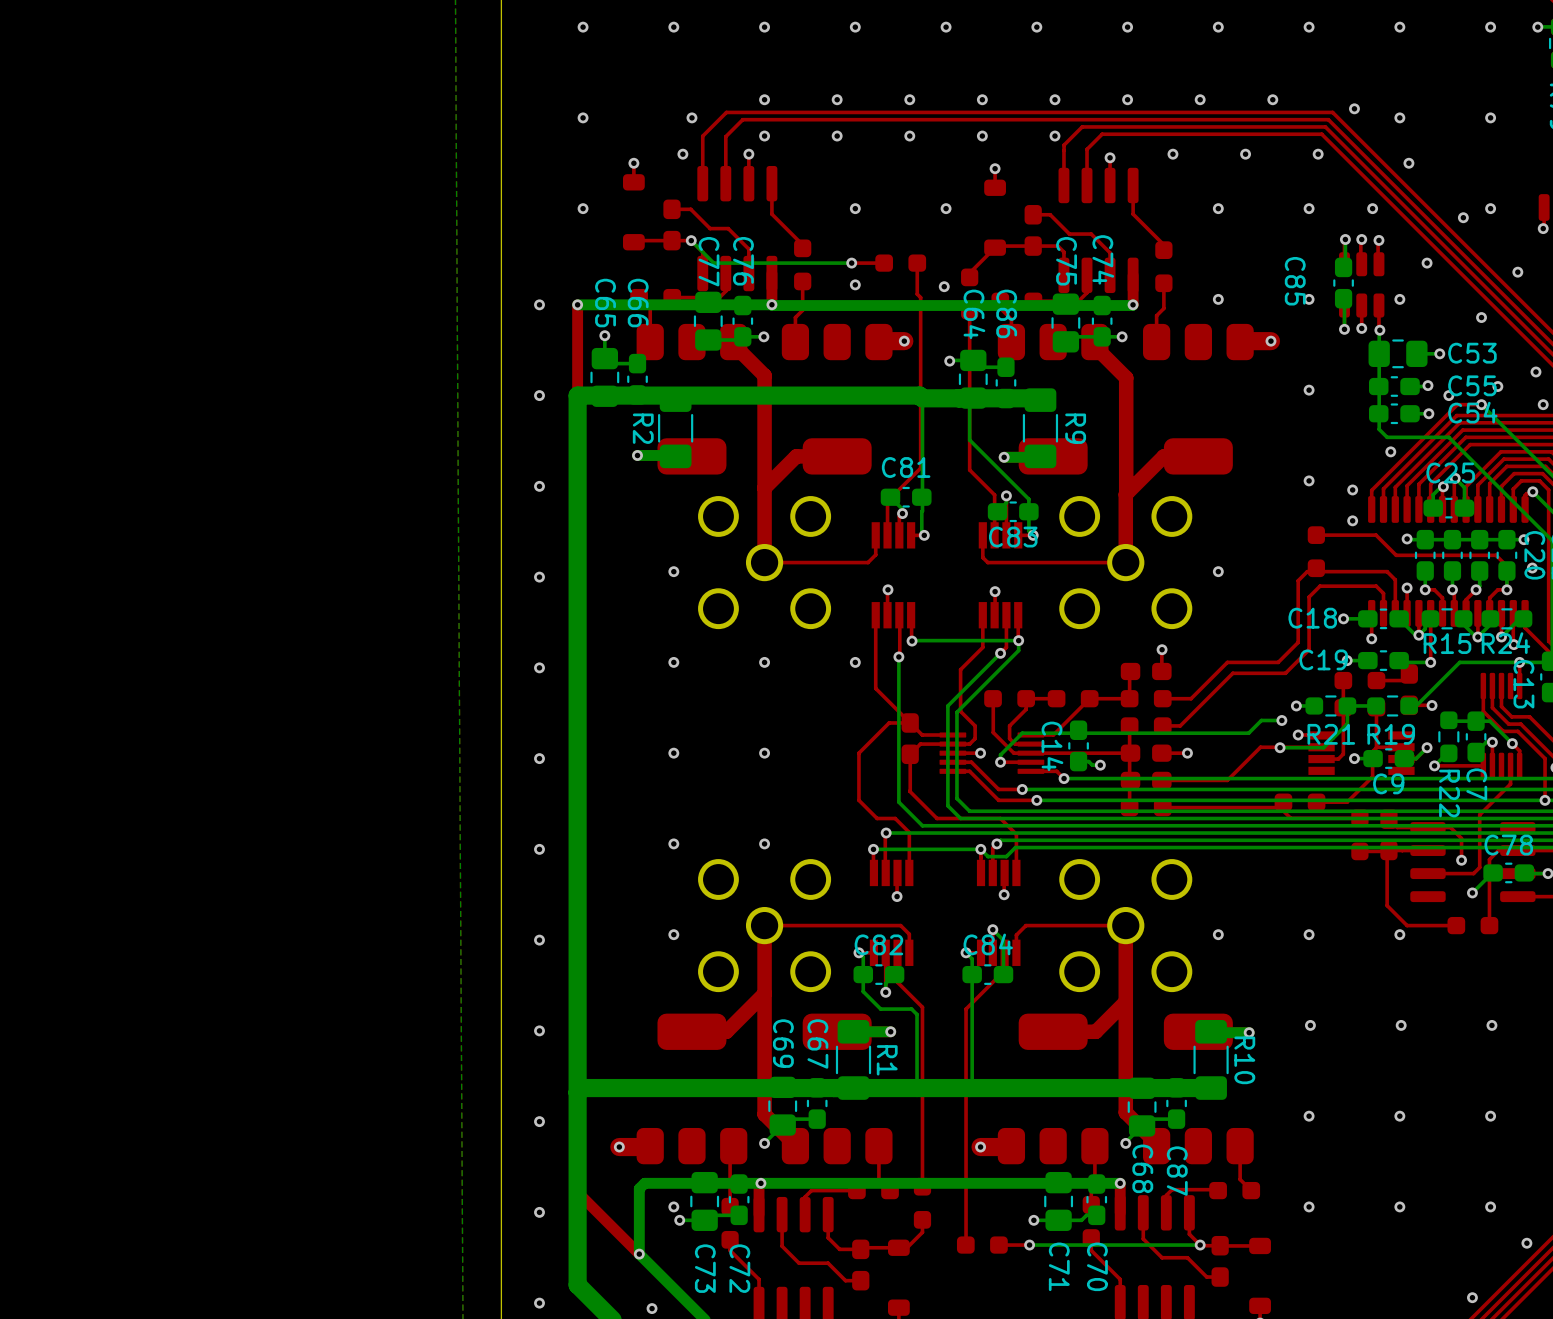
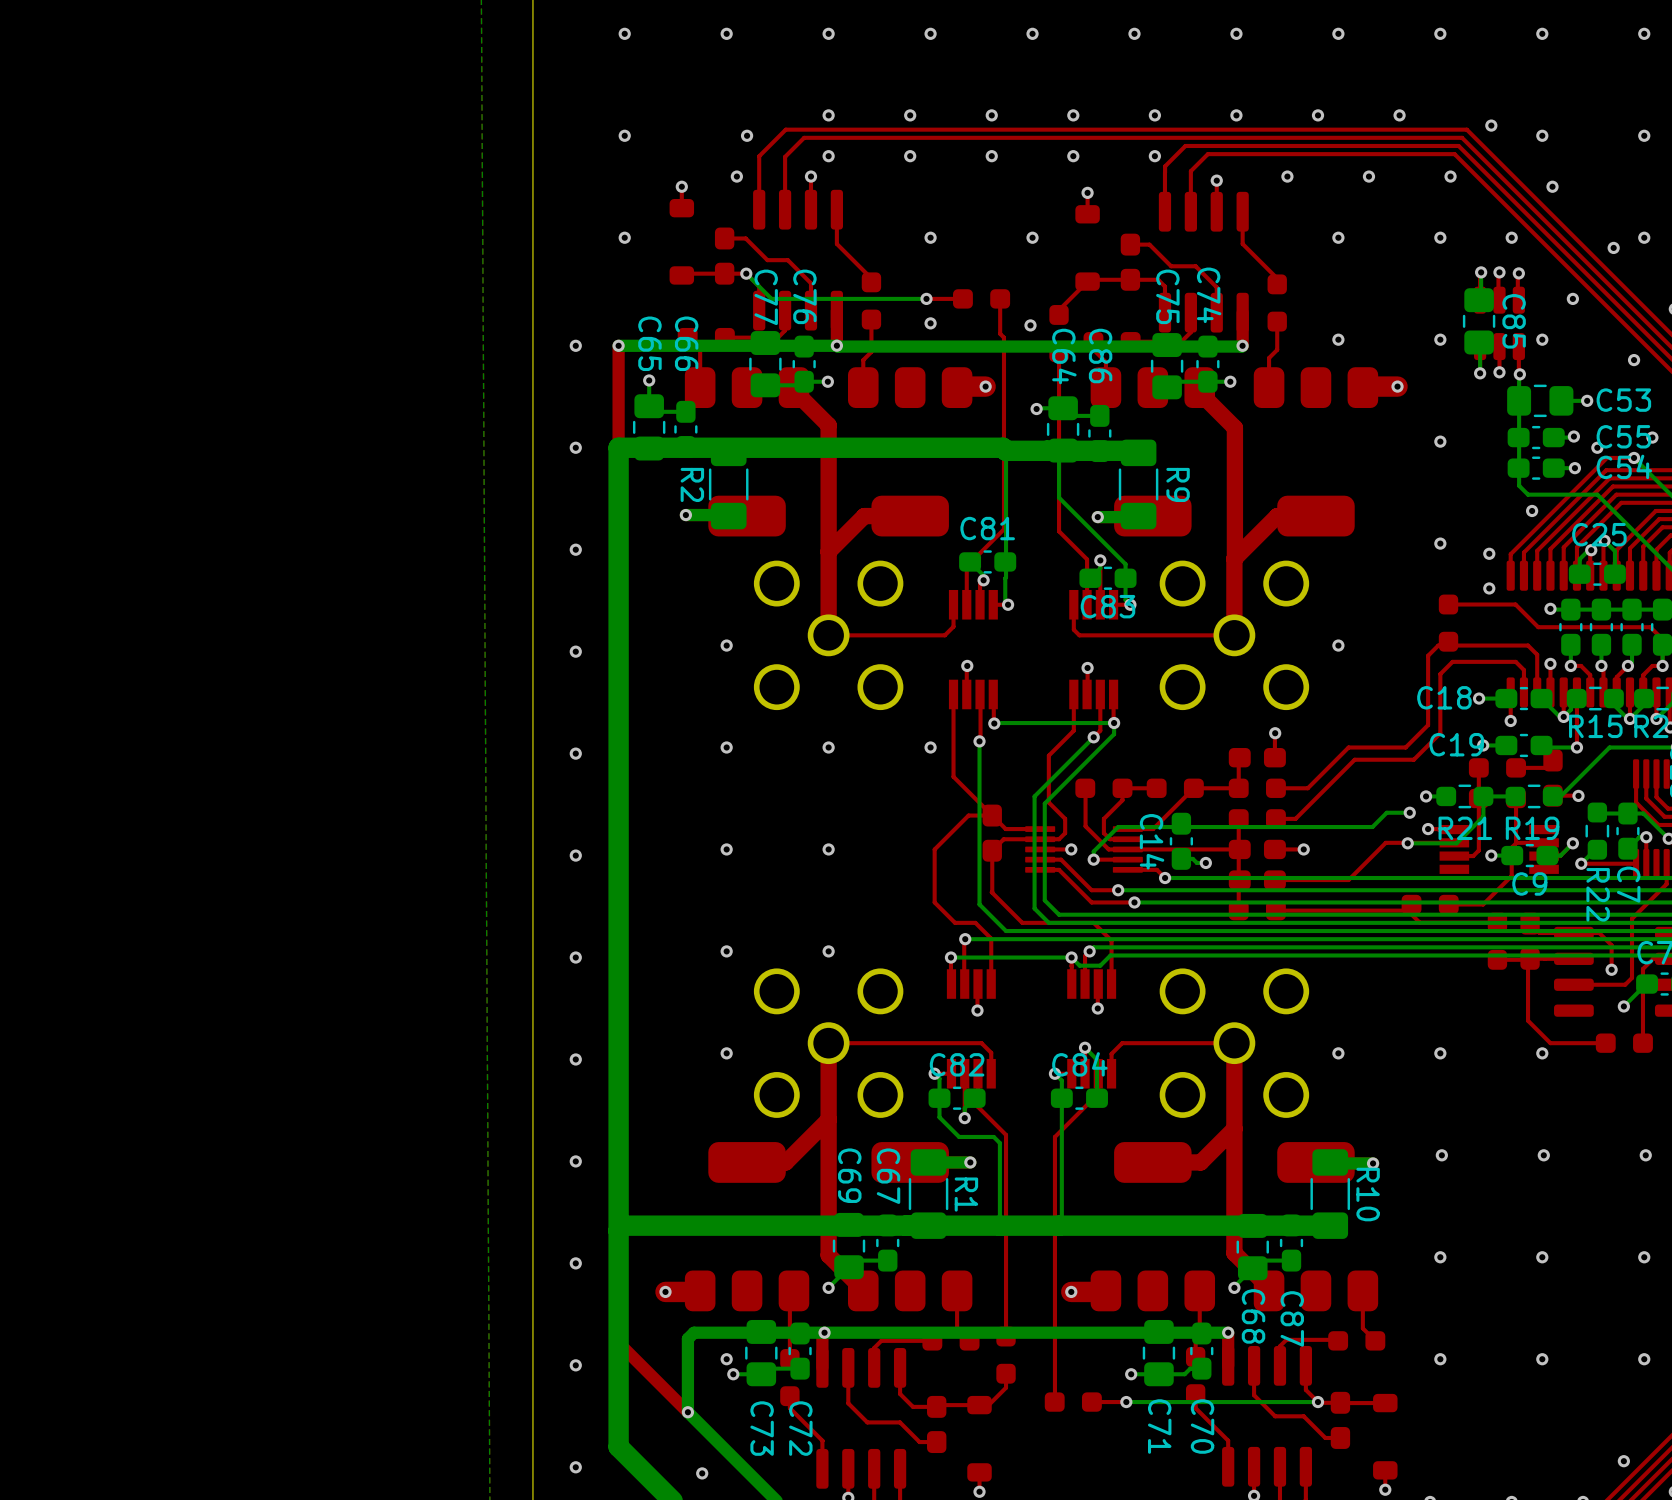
C85 footprint: [1333, 257, 1354, 309] -> [1462, 288, 1496, 355]
C85 name position: C85 (1295, 281) -> C85 (1514, 321)

